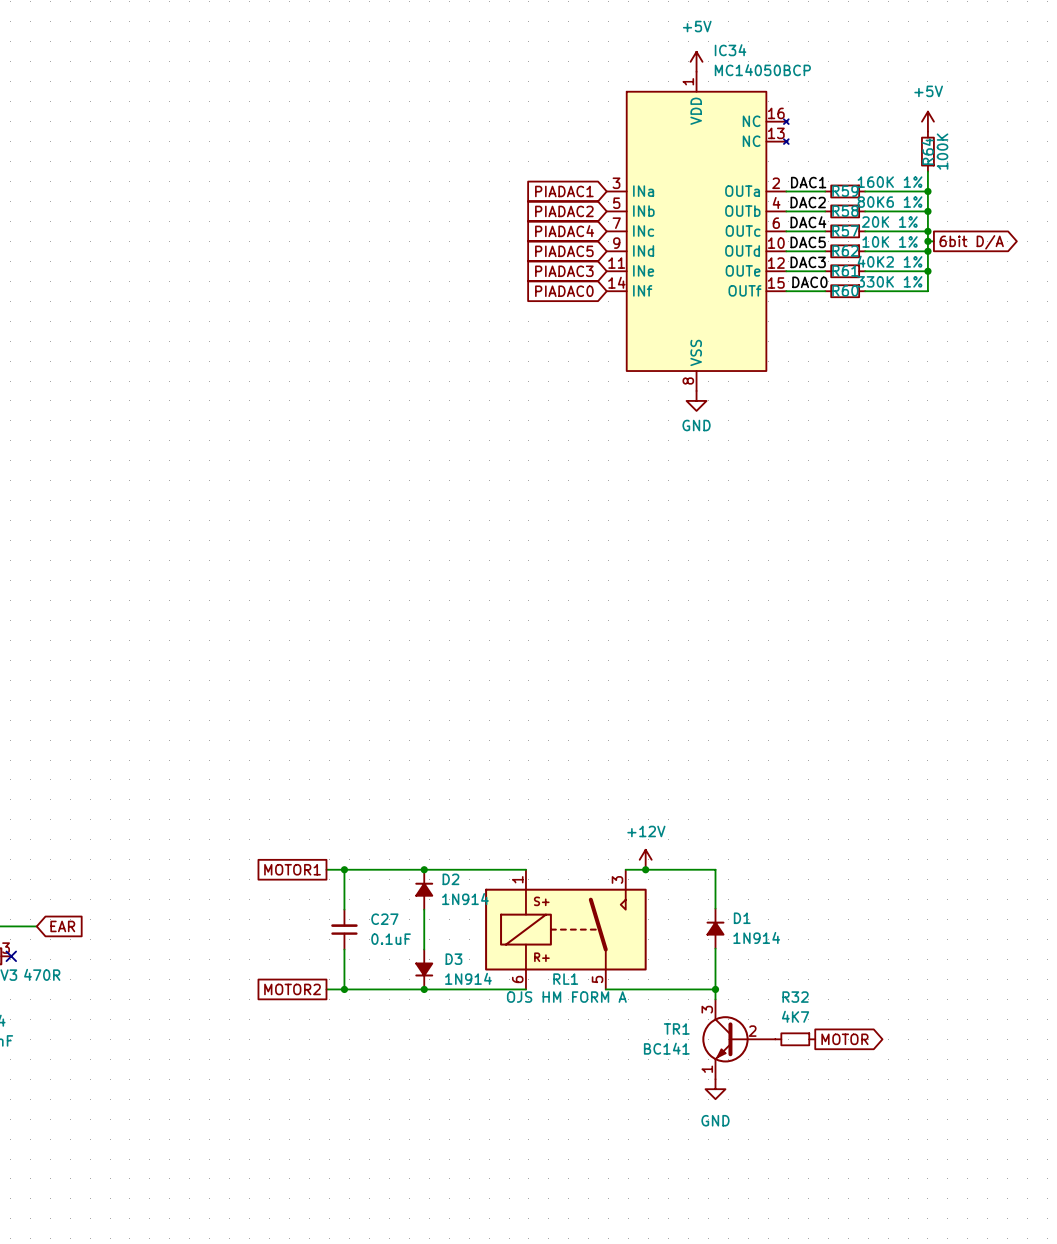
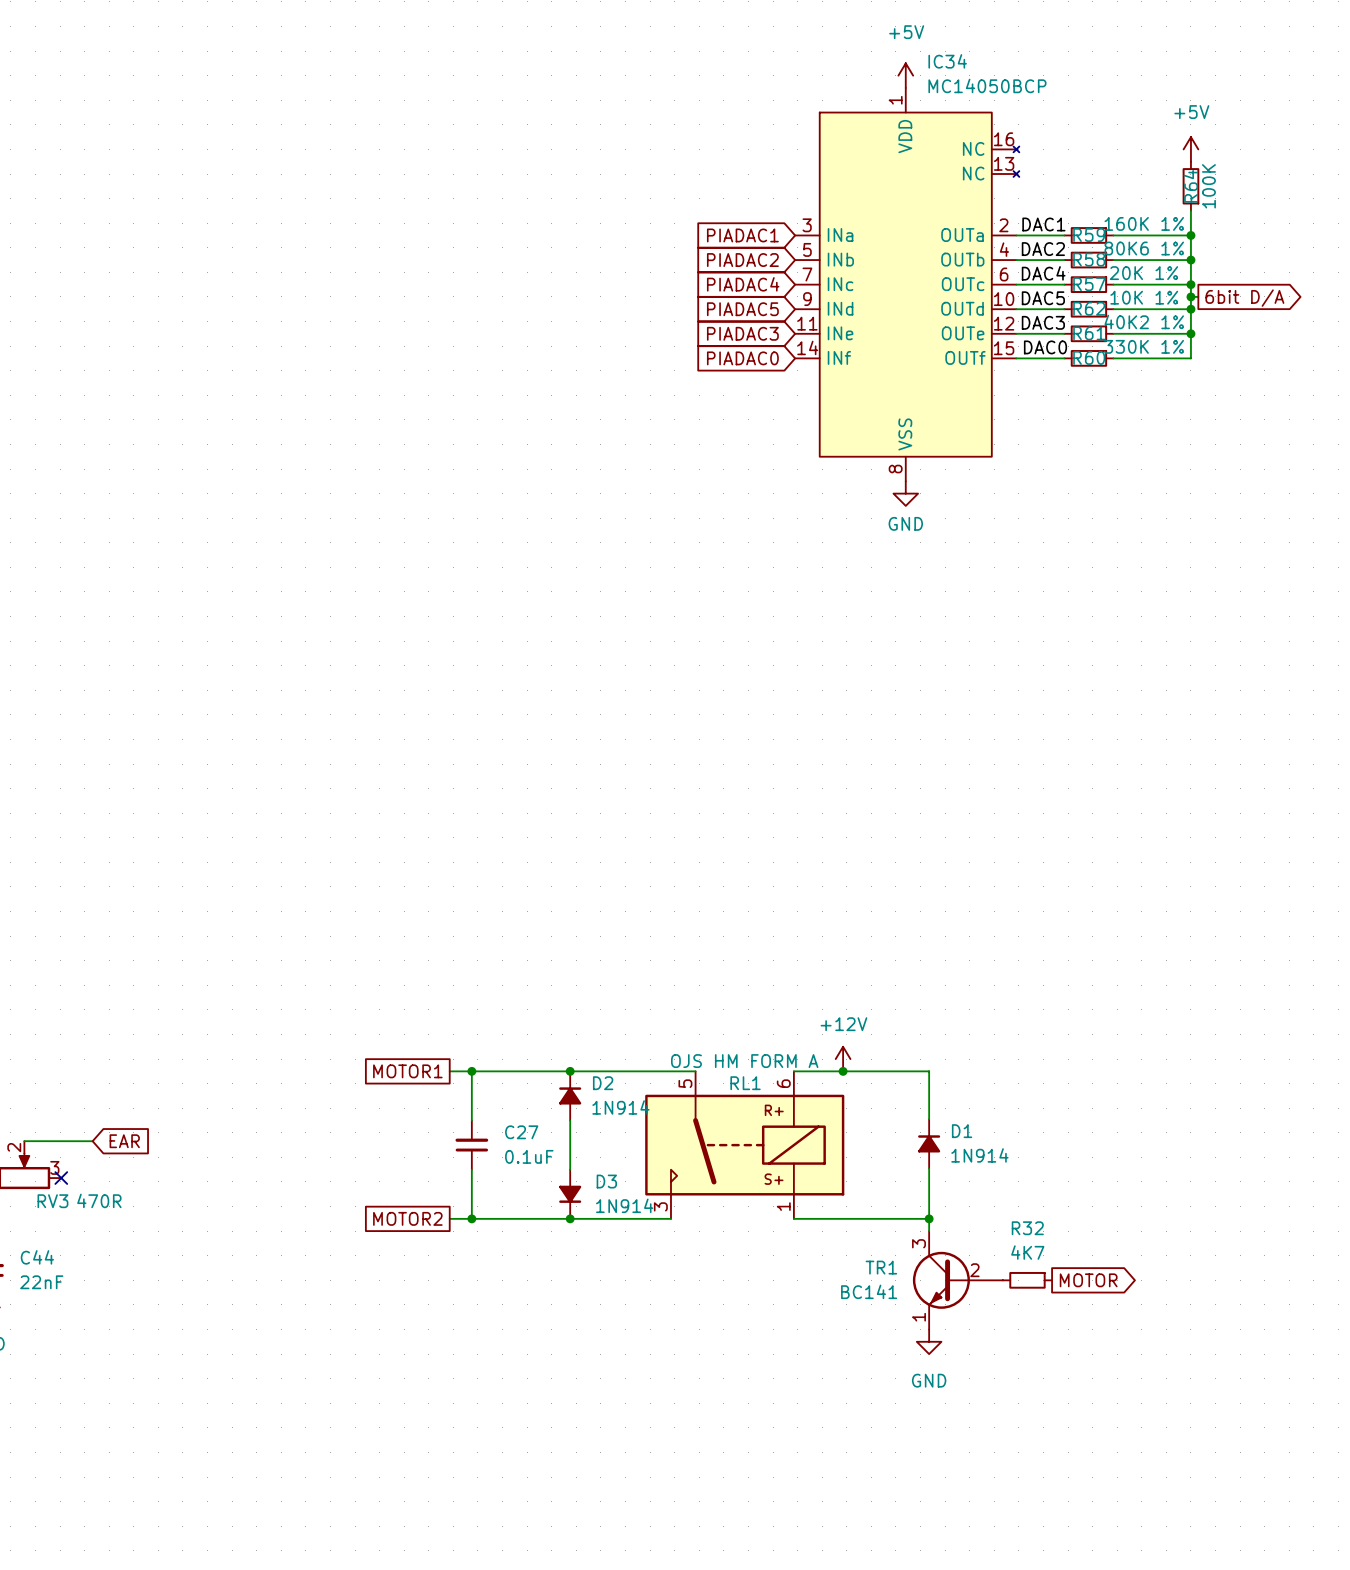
RL1 rotation: 0° (565, 929) -> 180° (744, 1145)
wire: (506, 989) (525, 989) -> (793, 1071) (818, 1071)

